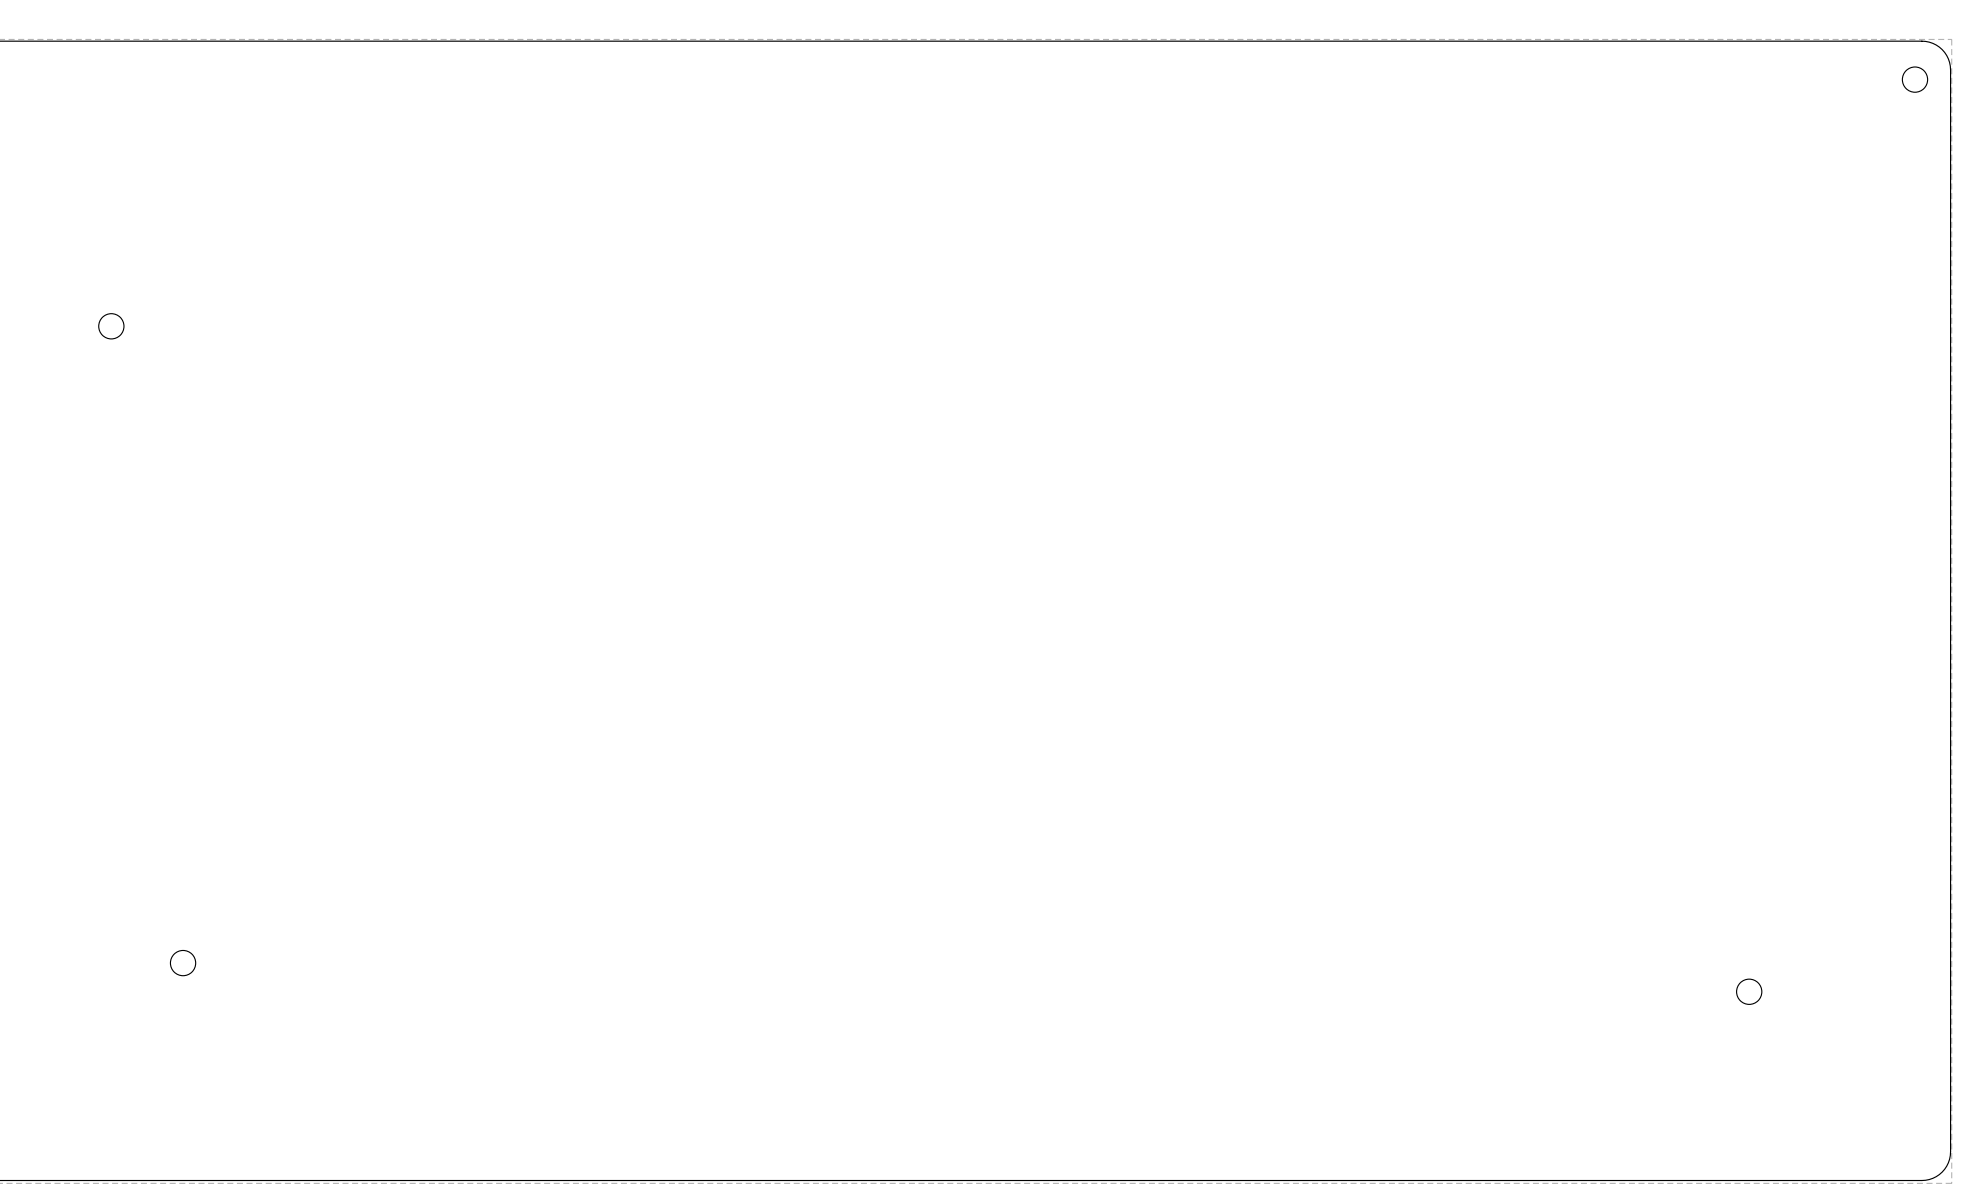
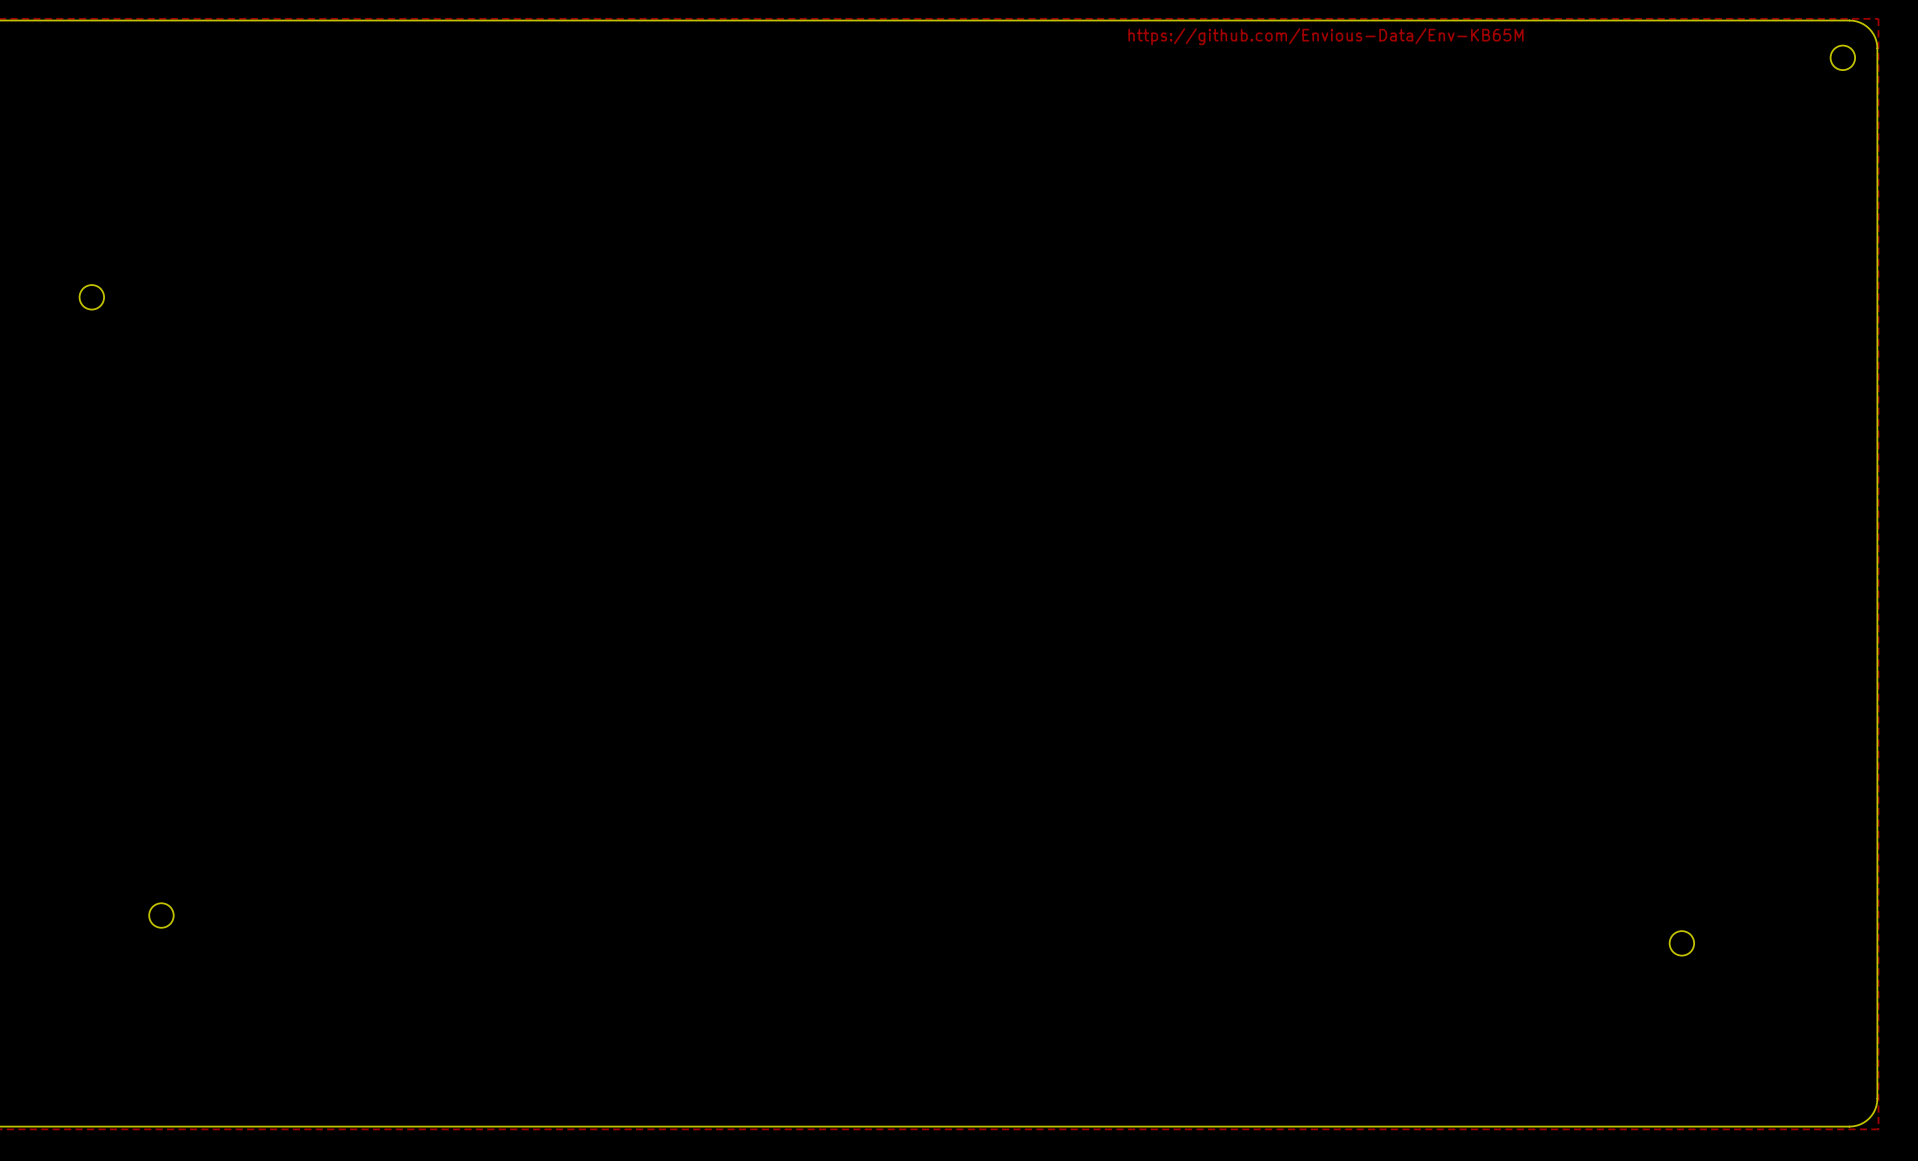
text: none -> https://github.com/Envious-Data/Env-KB65M (1326, 36)

